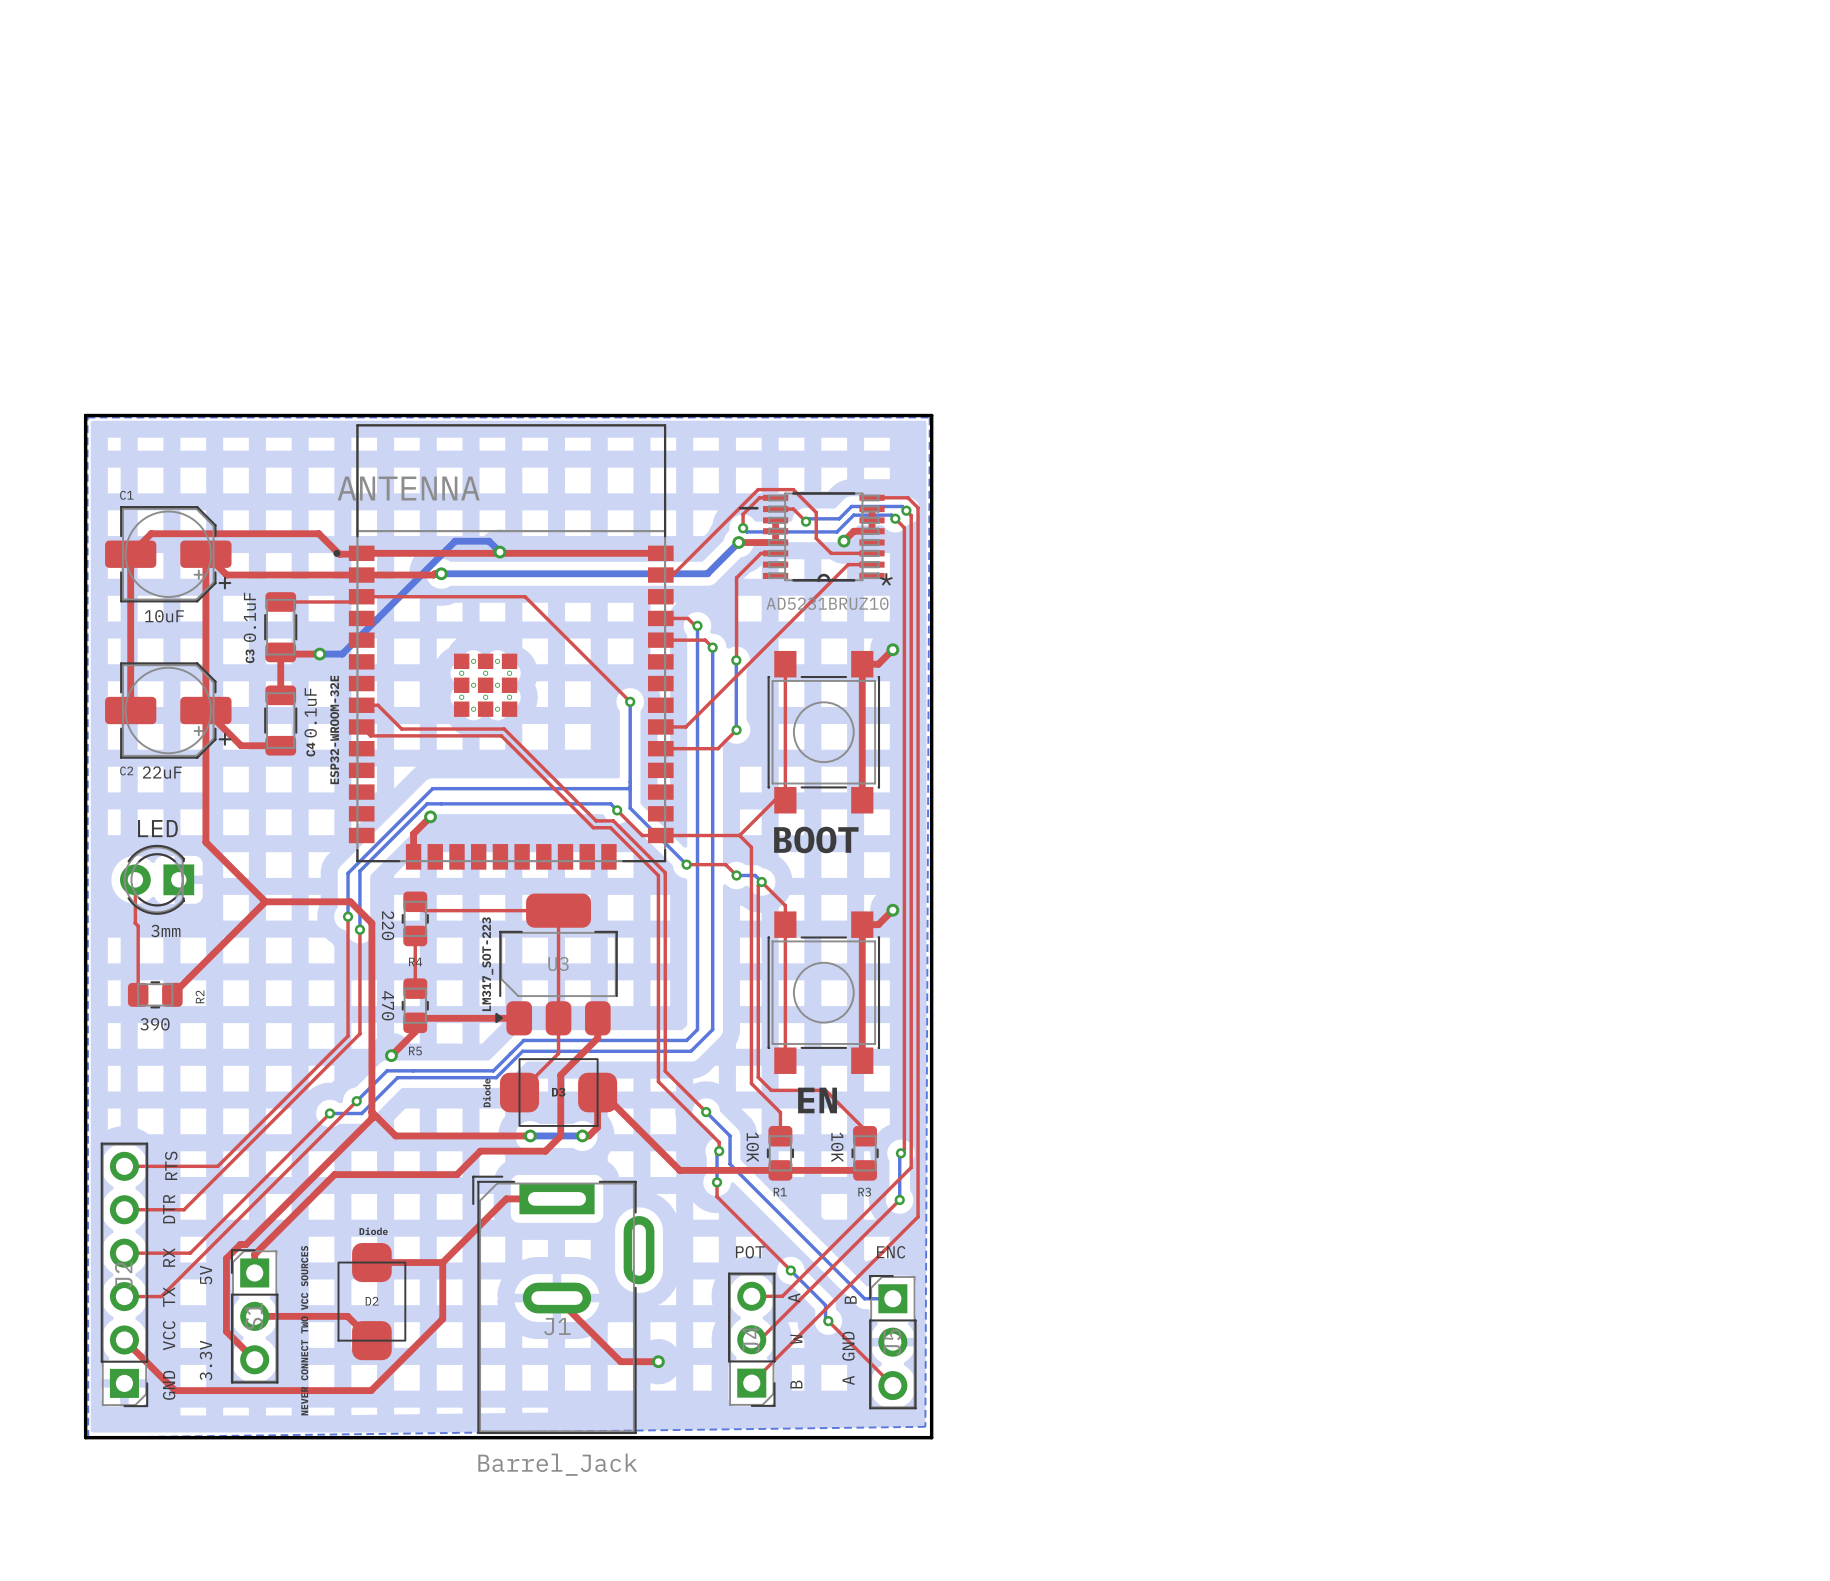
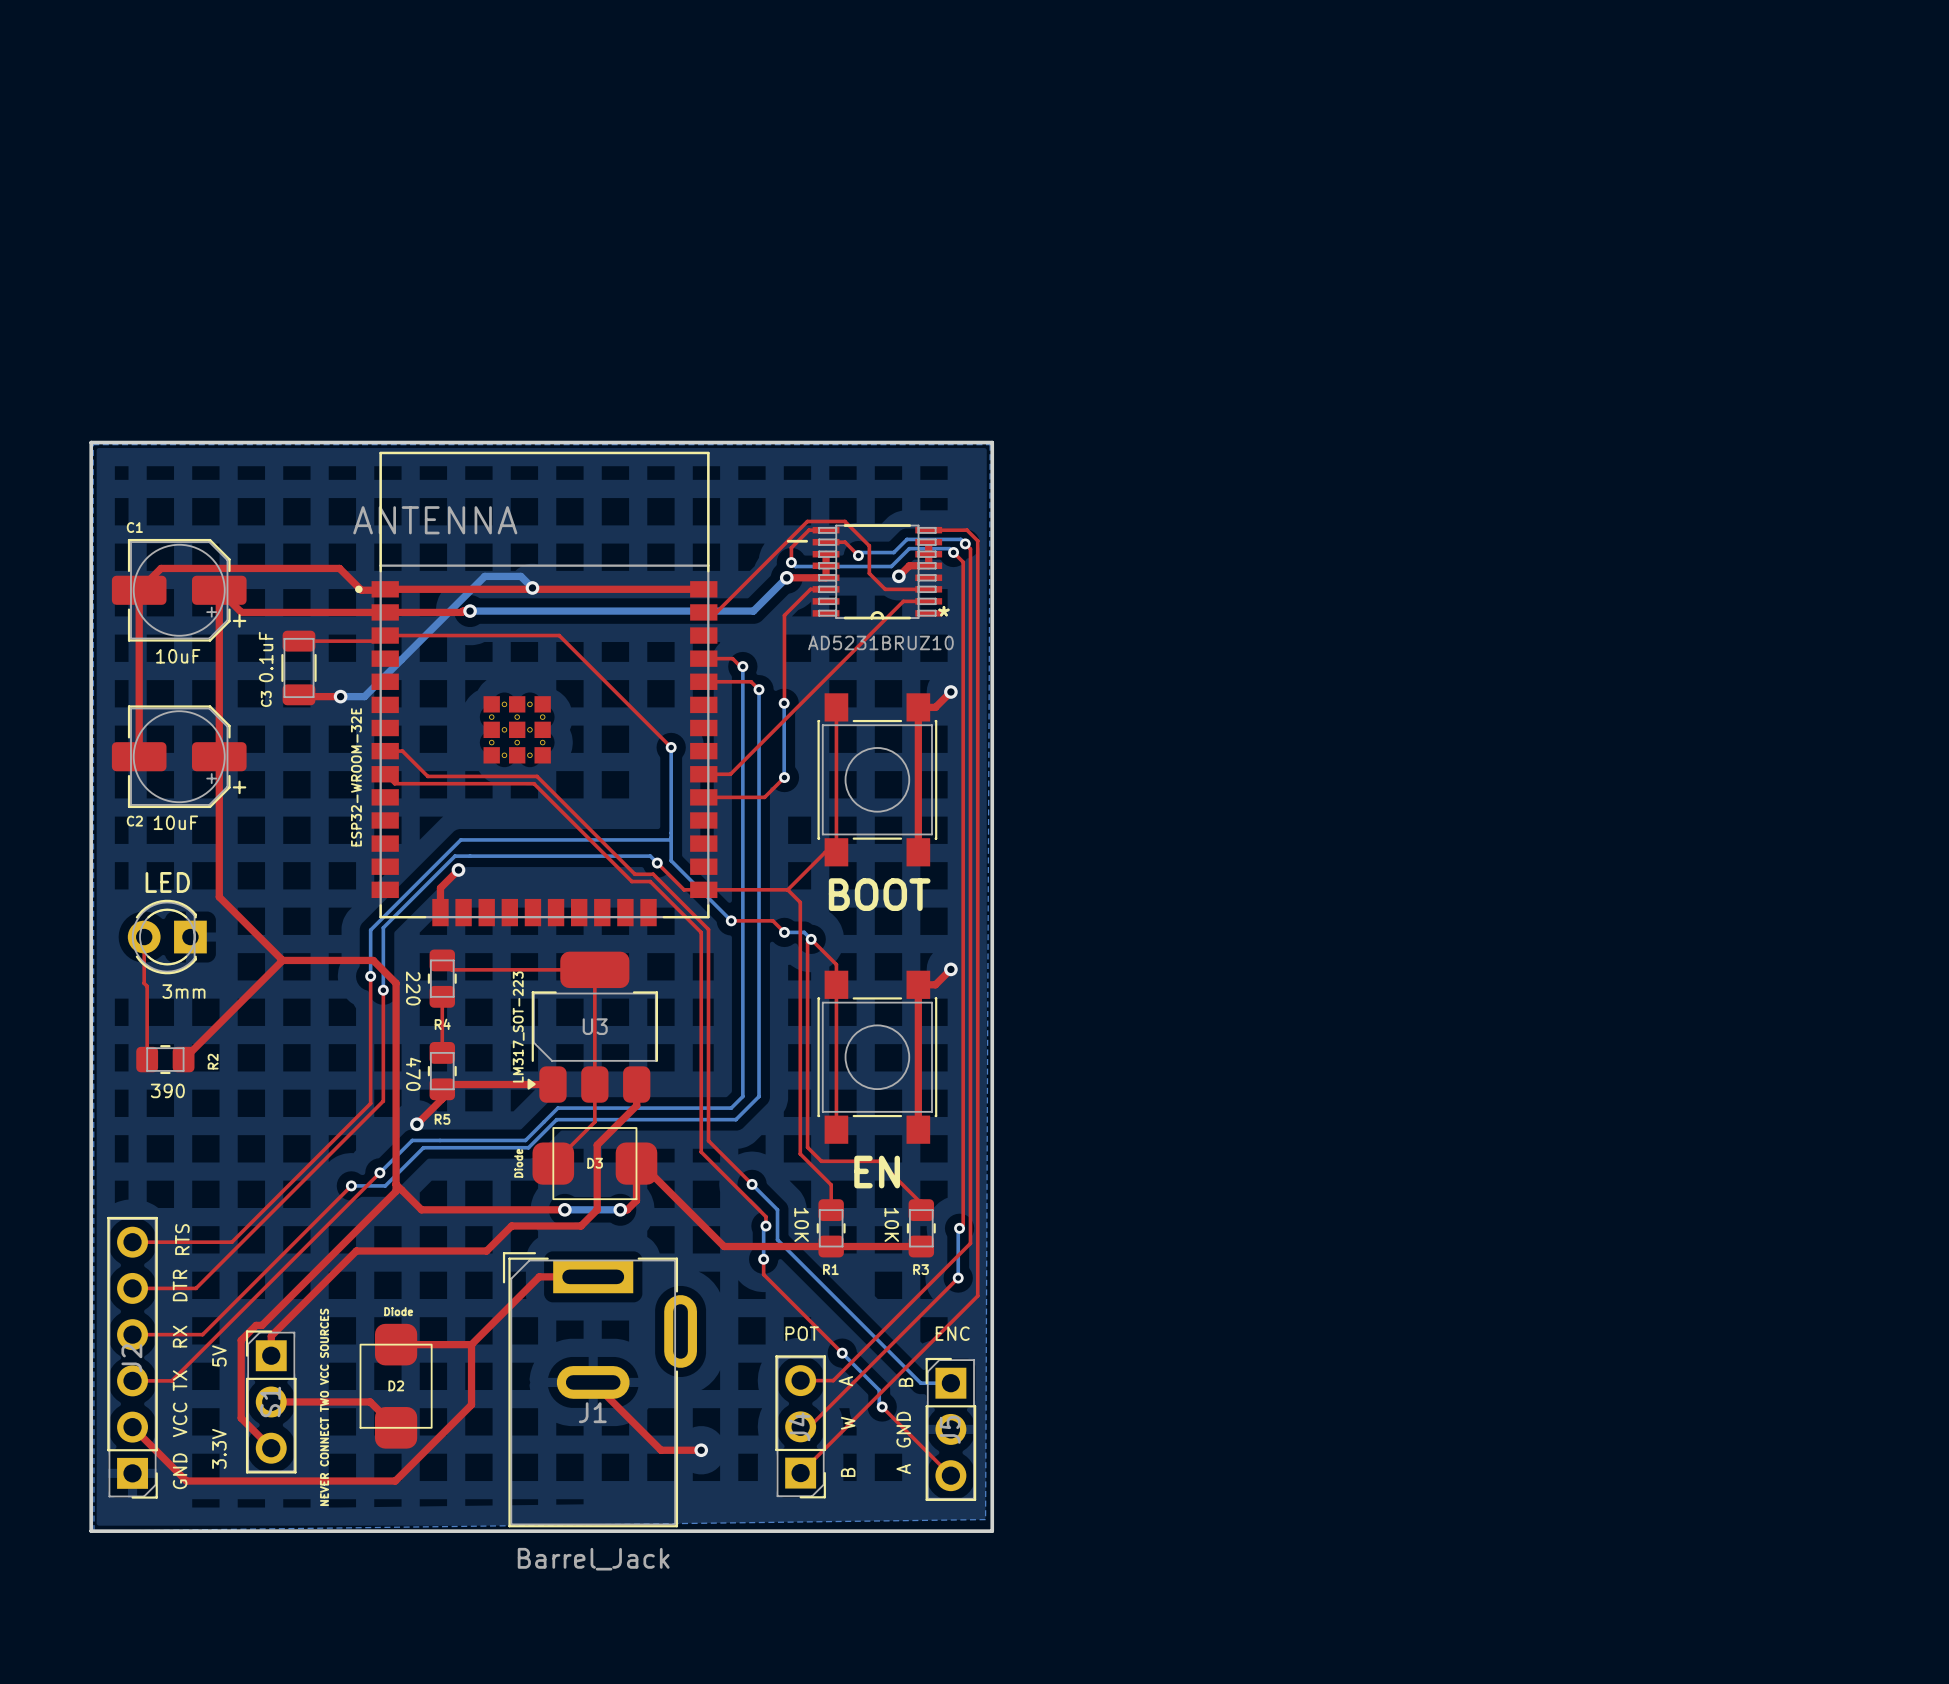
top track: (280, 652) (280, 695) -> none
top track: (205, 710) (241, 745) (280, 745) -> none
C4: 0.1uF (280, 720) -> none
text: 22uF (162, 772) -> 10uF (175, 822)

